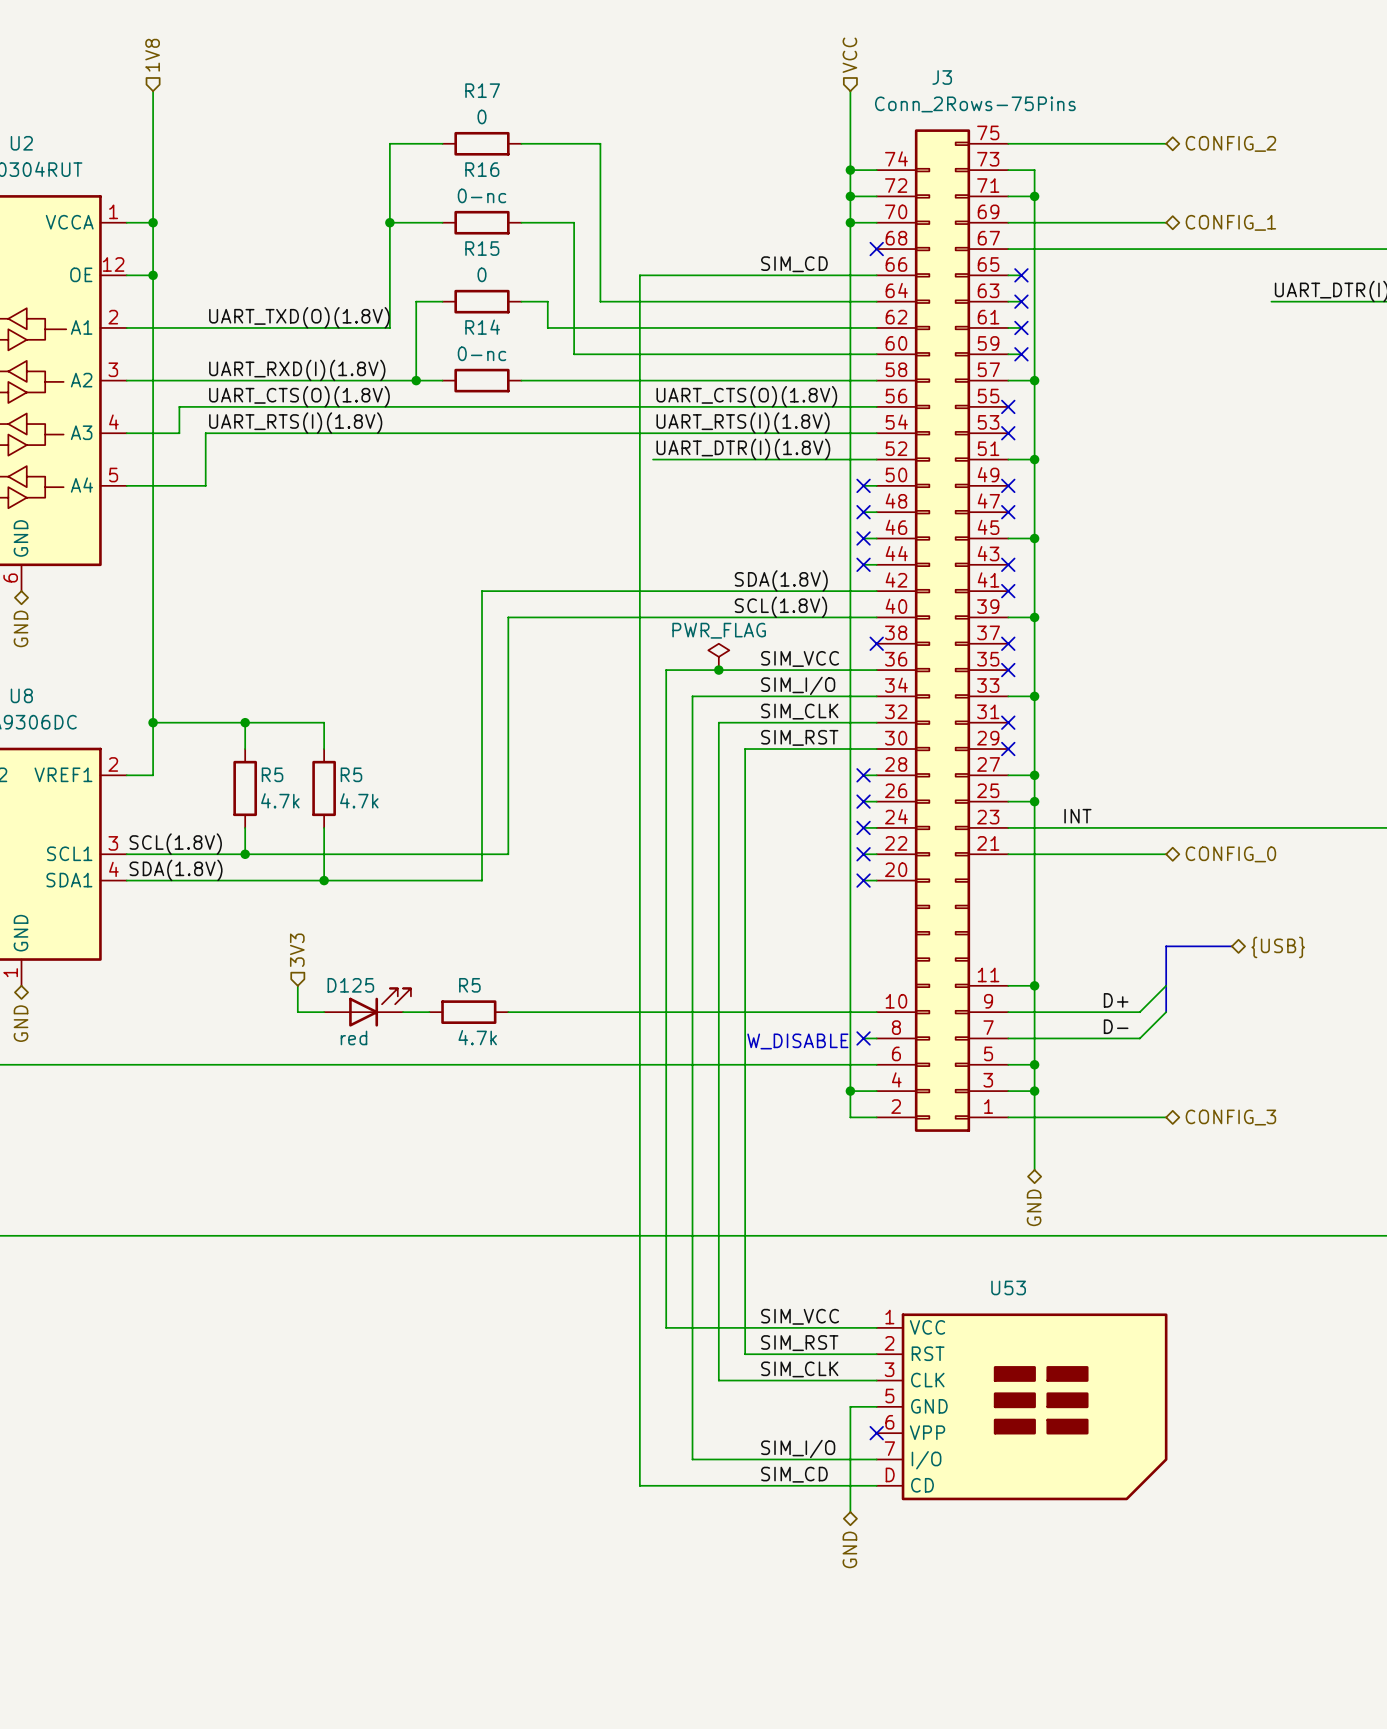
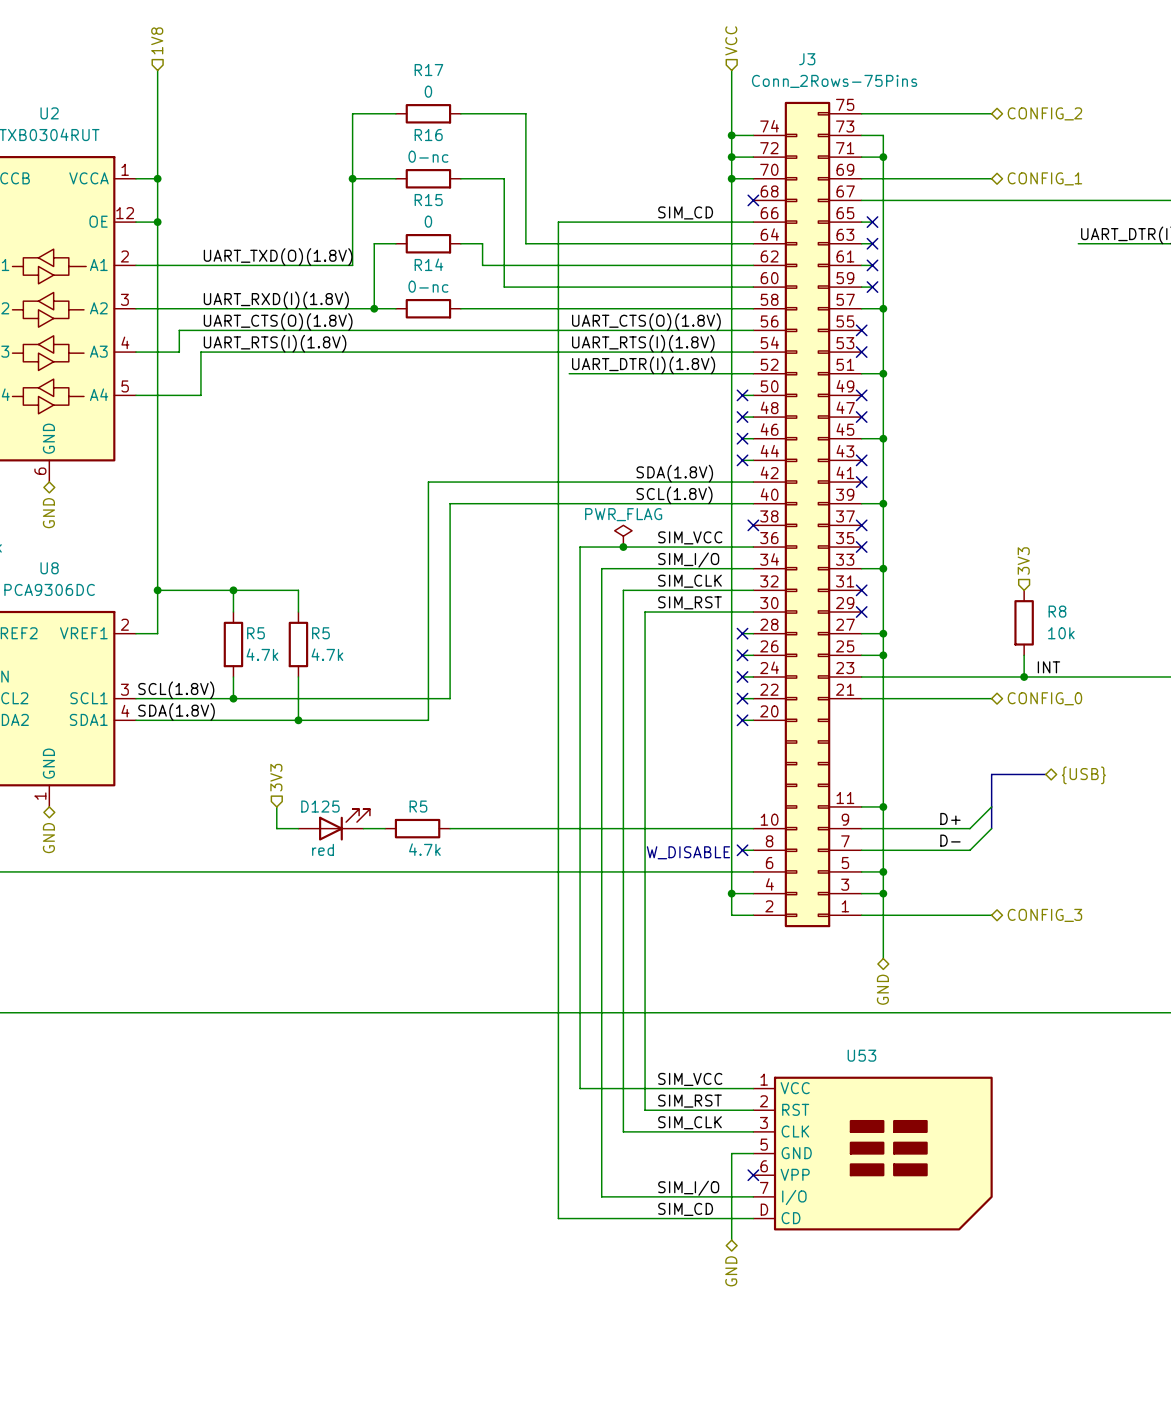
hierarchical label: none -> 3V3 (1023, 561)
R8: none -> 10k (1024, 622)
wire: none -> (1024, 655) (1024, 676)
label position: INT (1077, 816) -> INT (1048, 667)
junction: none -> (1024, 676)

